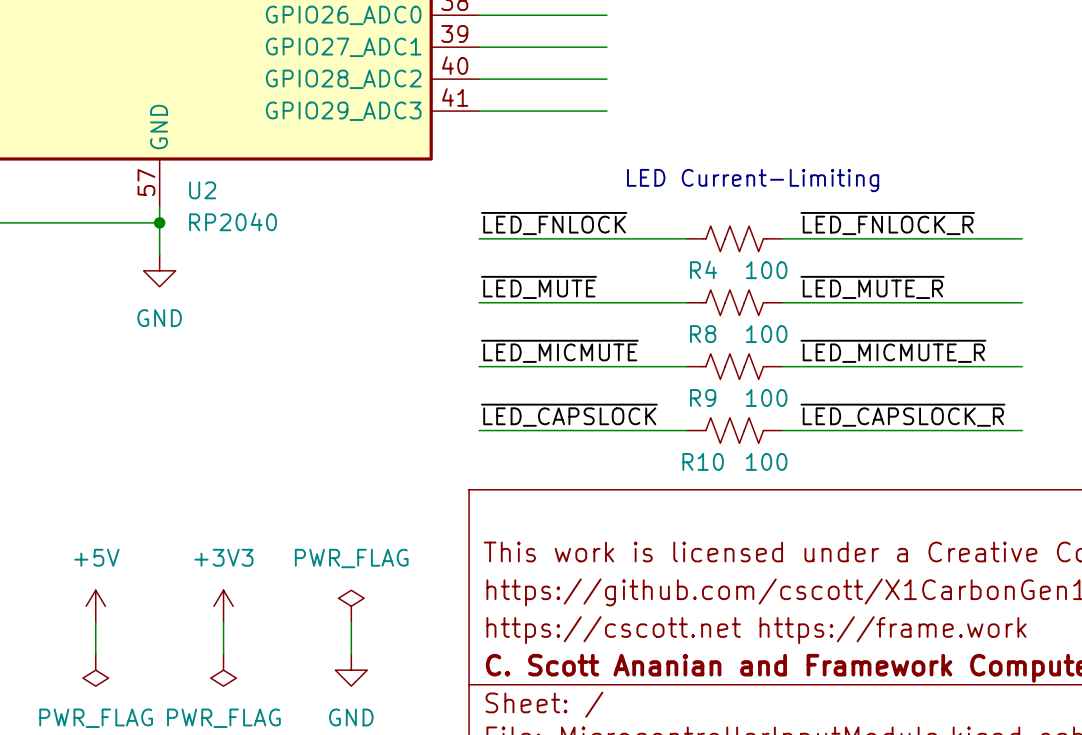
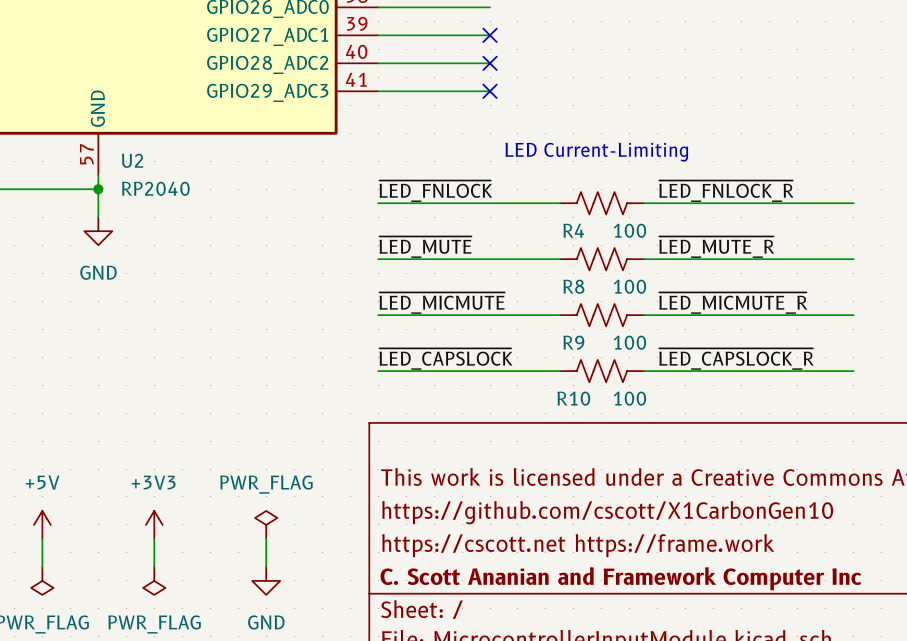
no-connect mark: none -> (490, 35)
no-connect mark: none -> (490, 63)
no-connect mark: none -> (490, 91)

